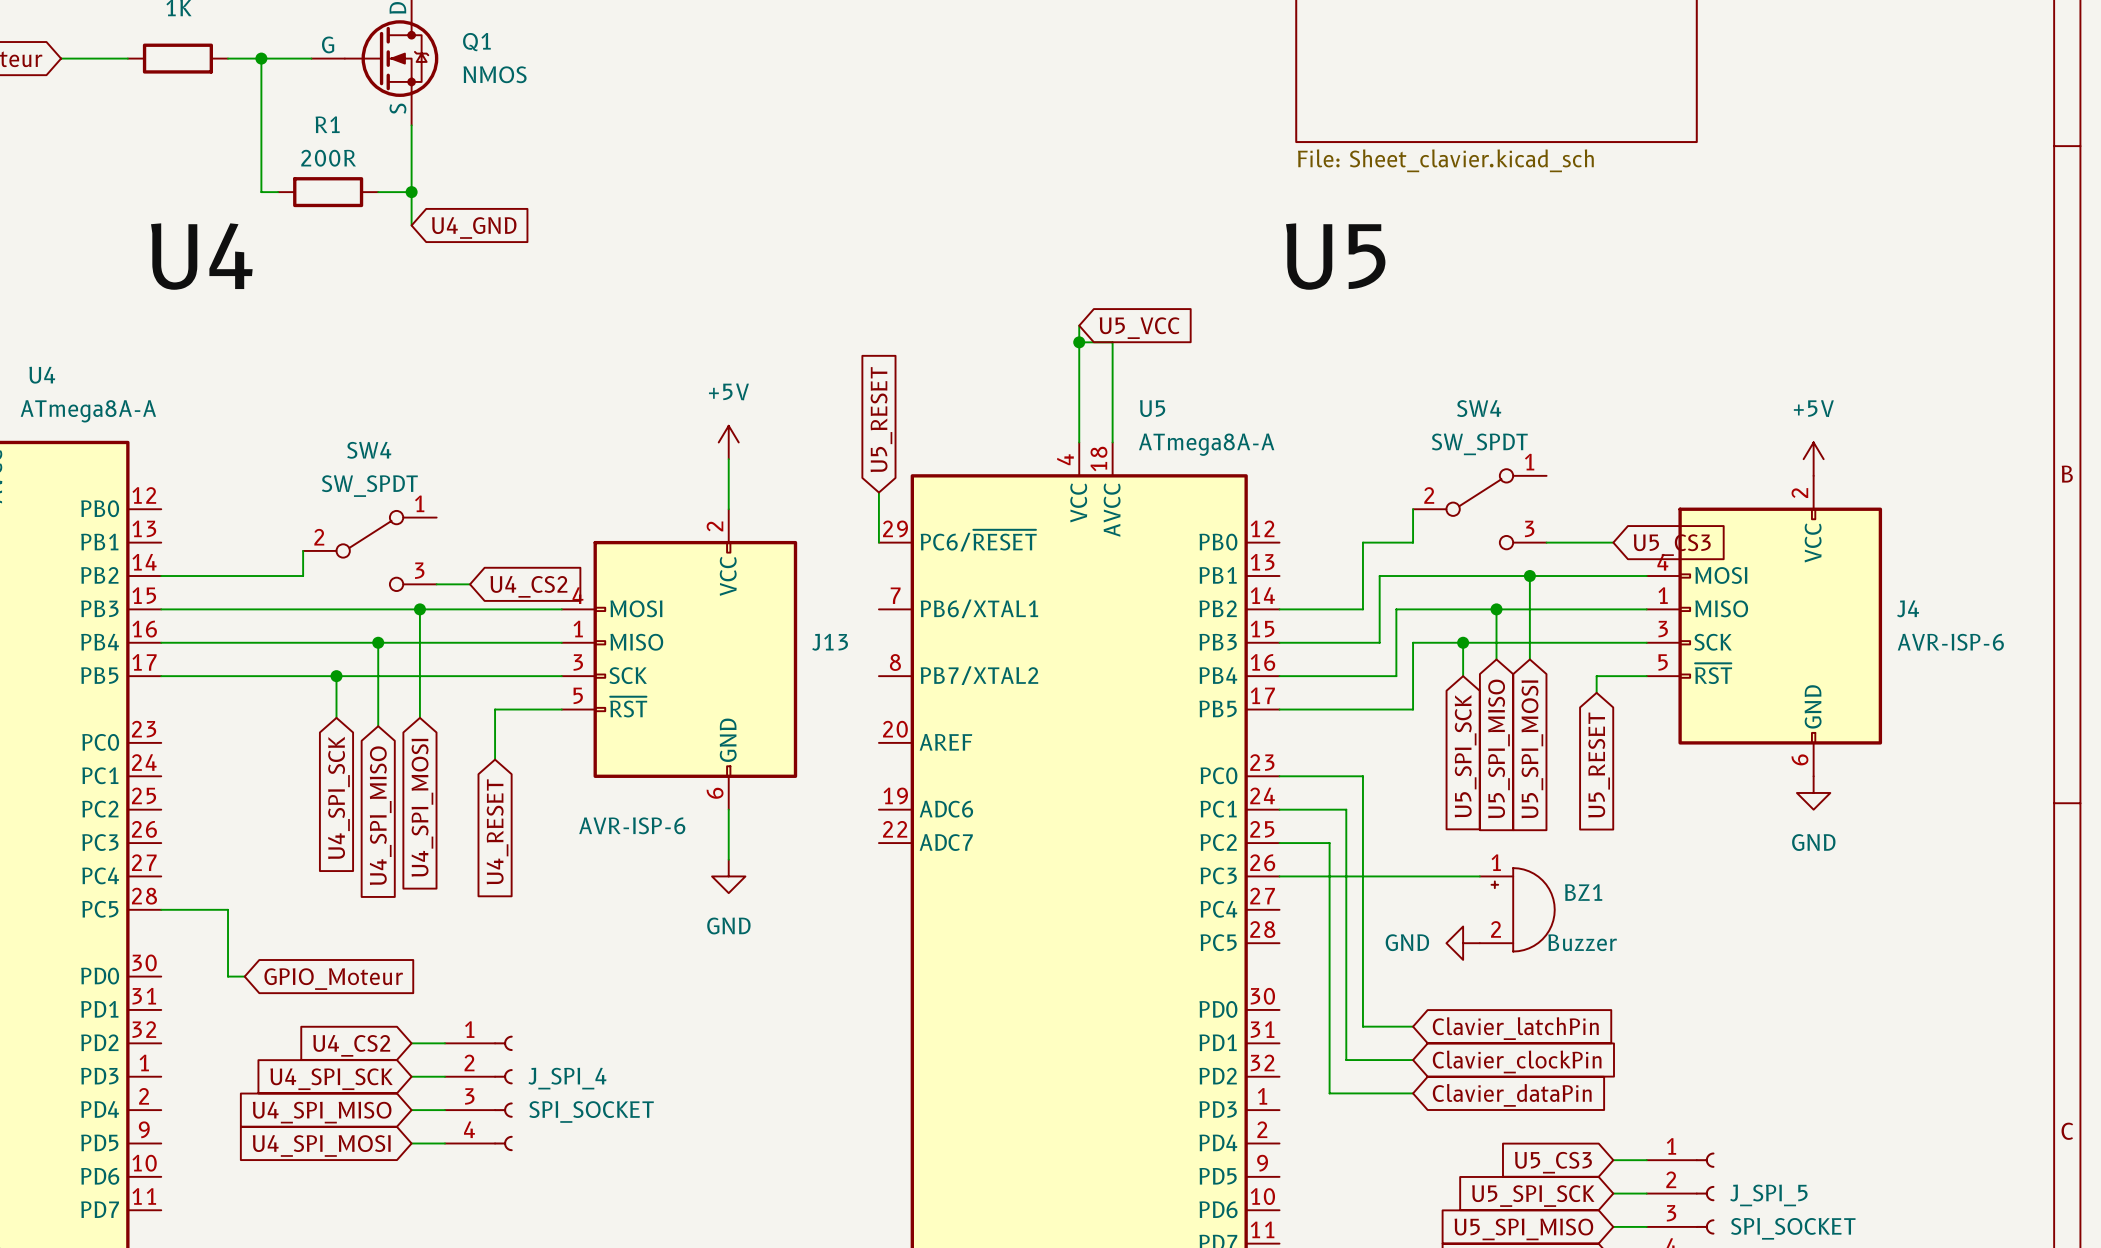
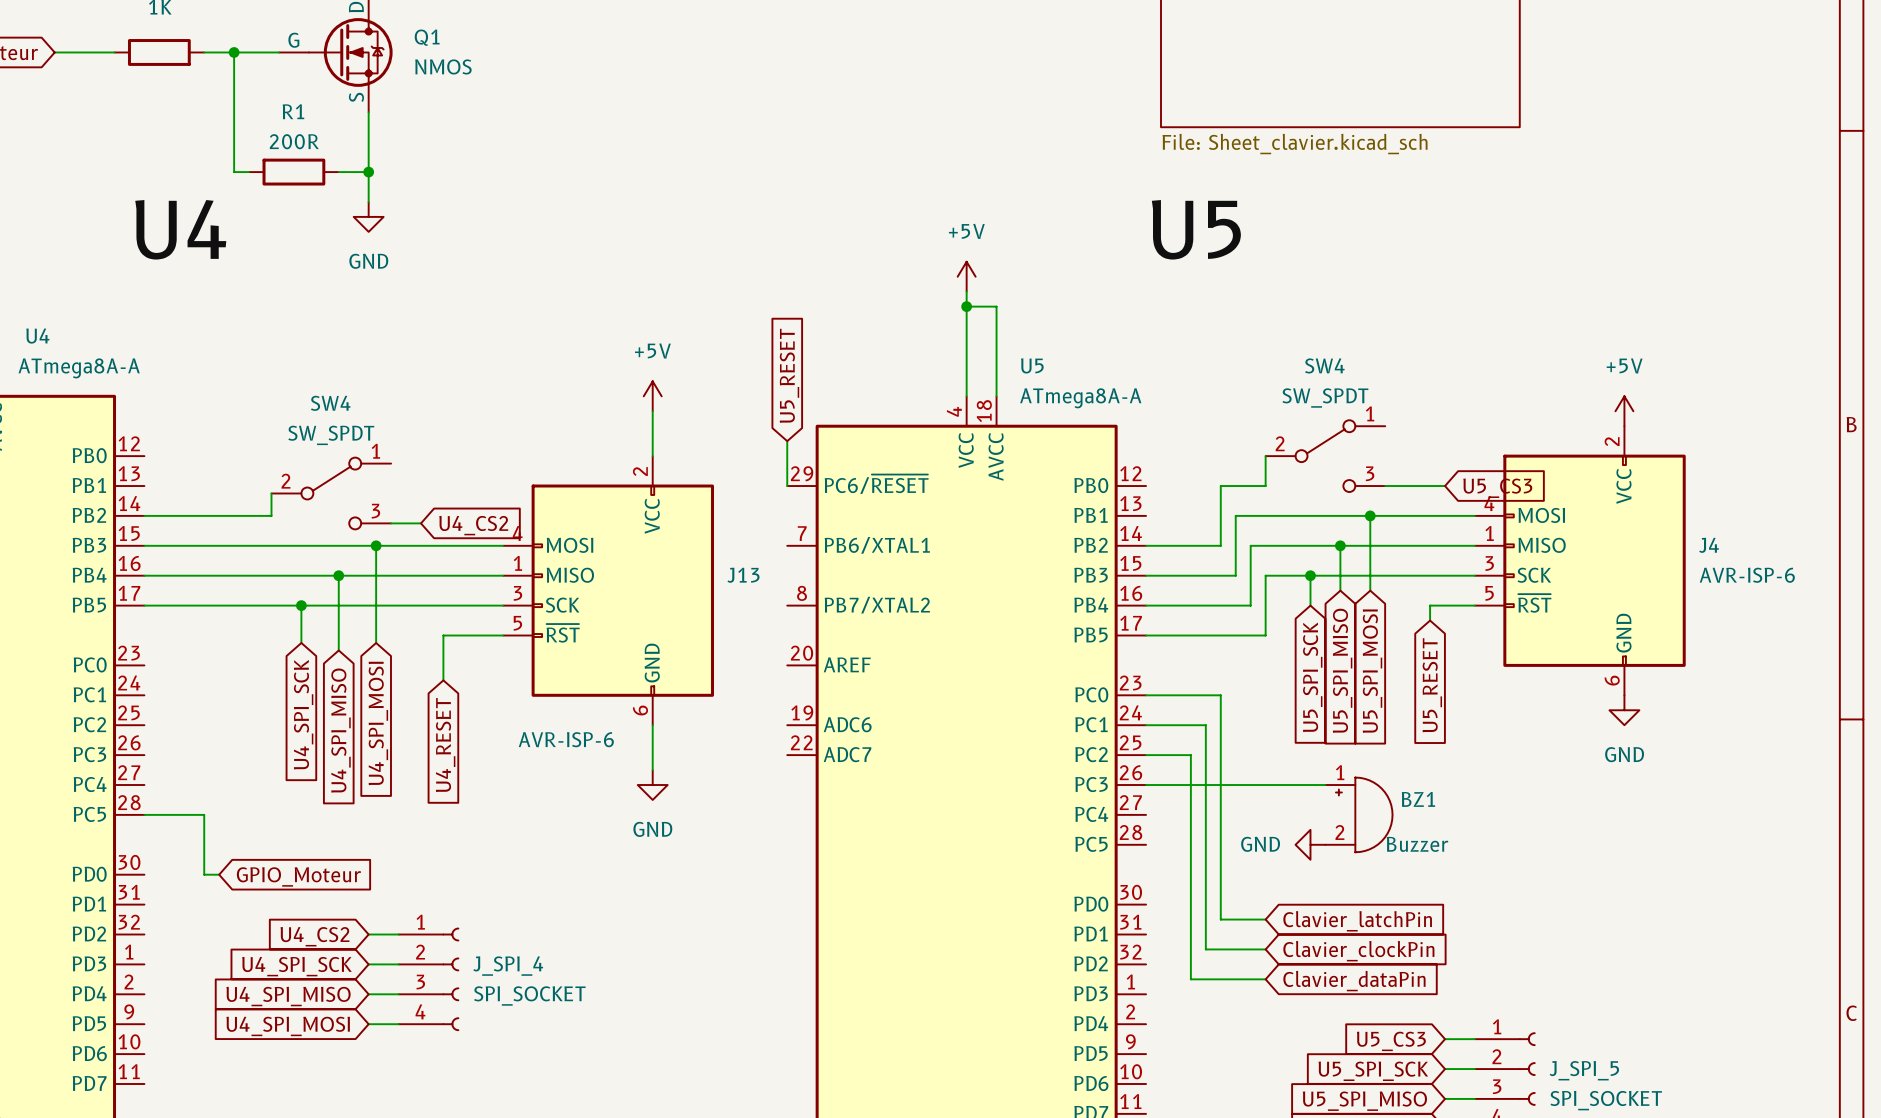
global label: U4_GND (474, 227) -> none
power symbol: none -> GND (368, 216)
power symbol: none -> +5V (966, 276)
global label: U5_VCC (1139, 328) -> none

